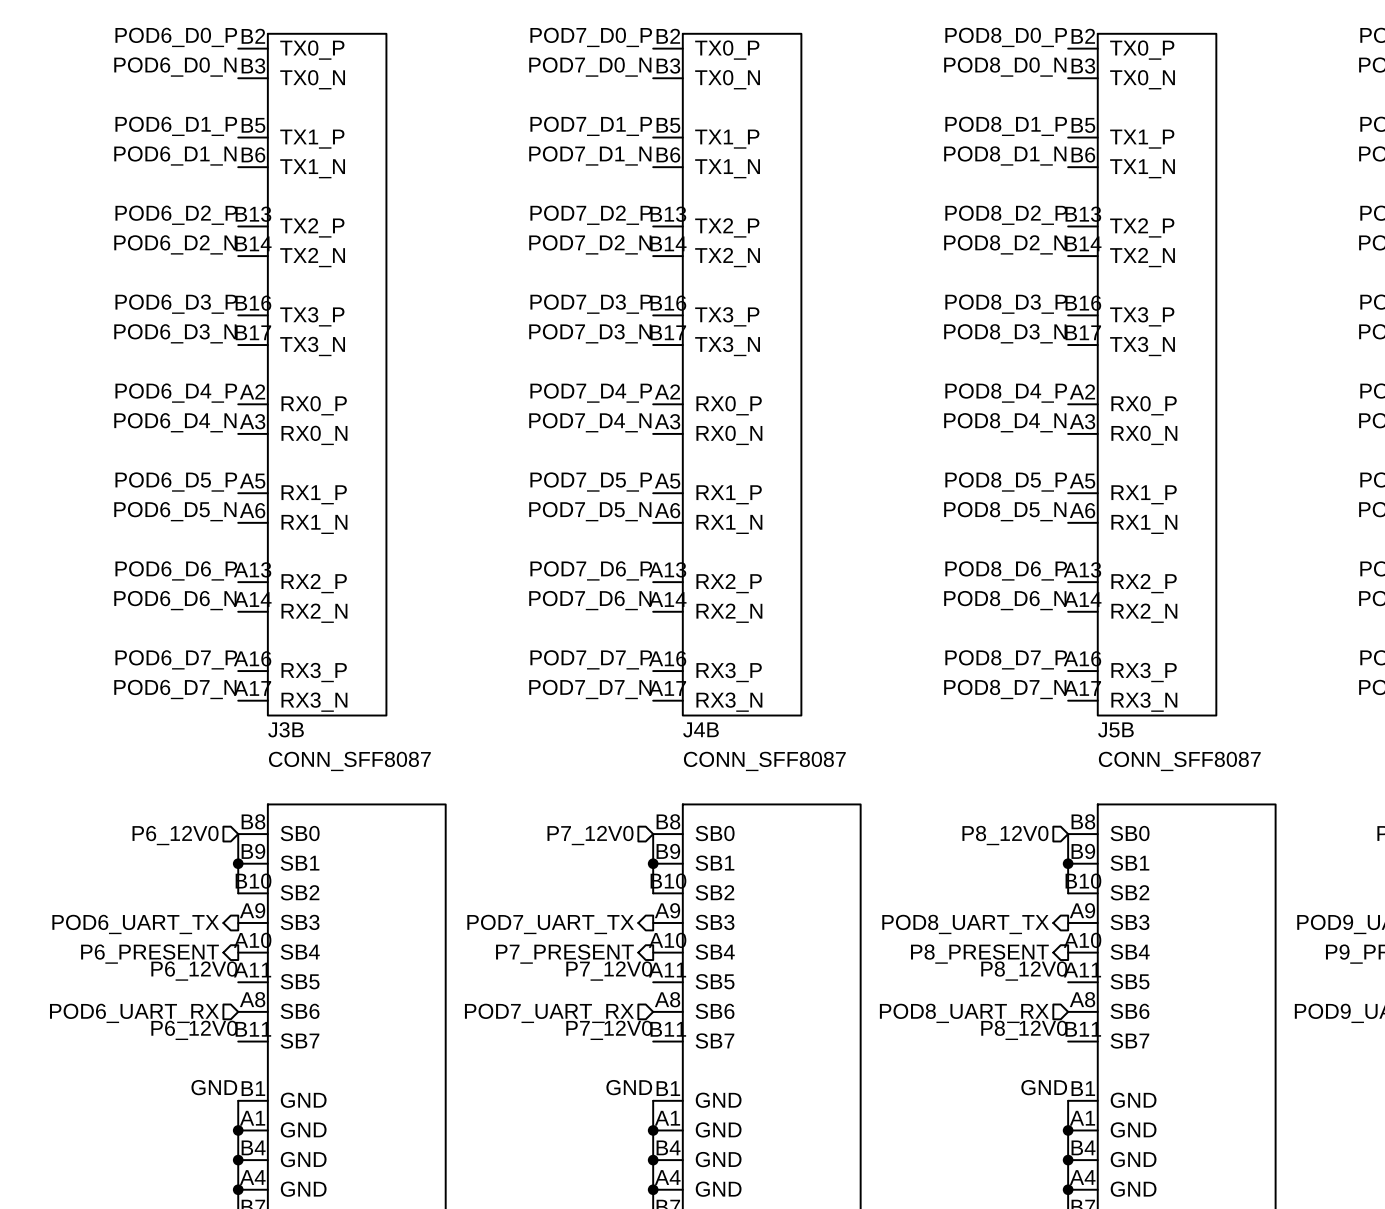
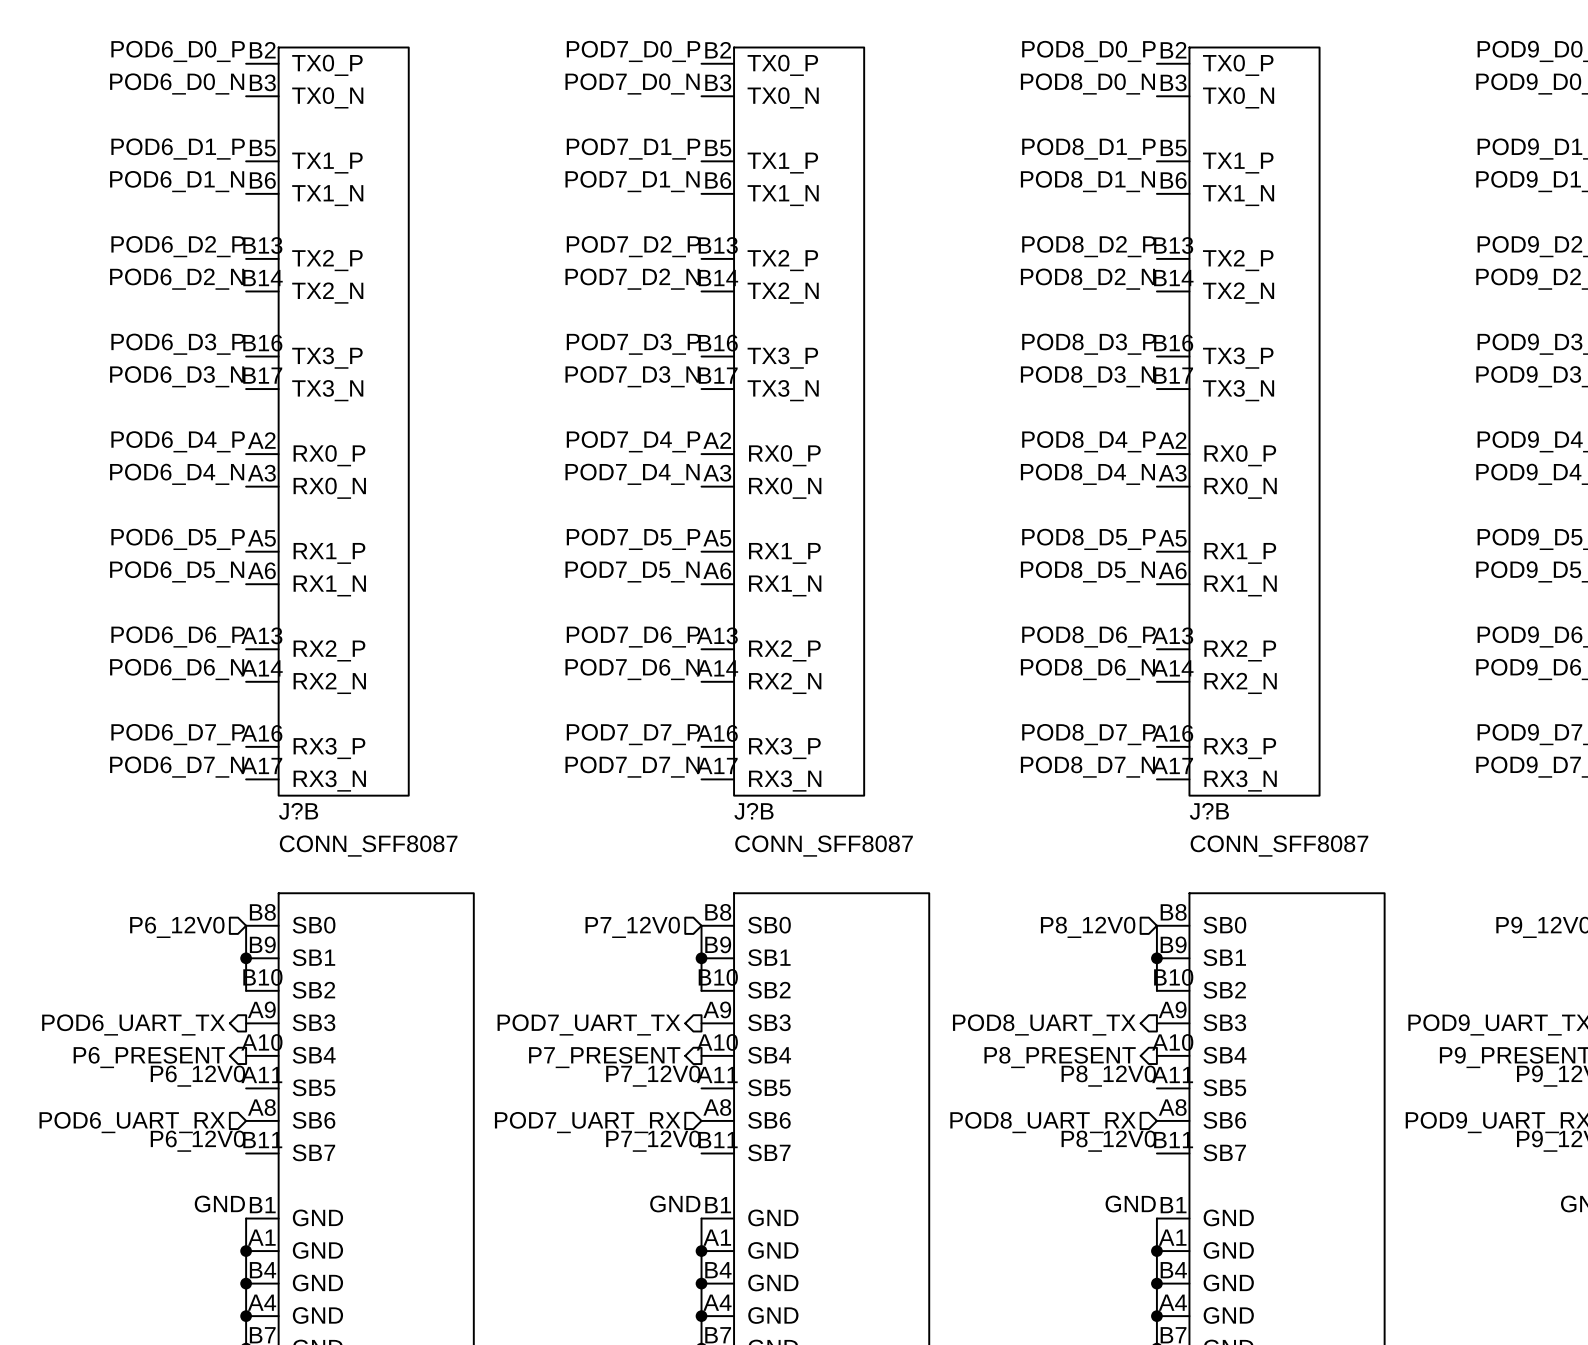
J3B name: J3B (286, 729) -> J?B (298, 811)
J4B name: J4B (700, 729) -> J?B (753, 811)
J5B name: J5B (1115, 729) -> J?B (1209, 811)

